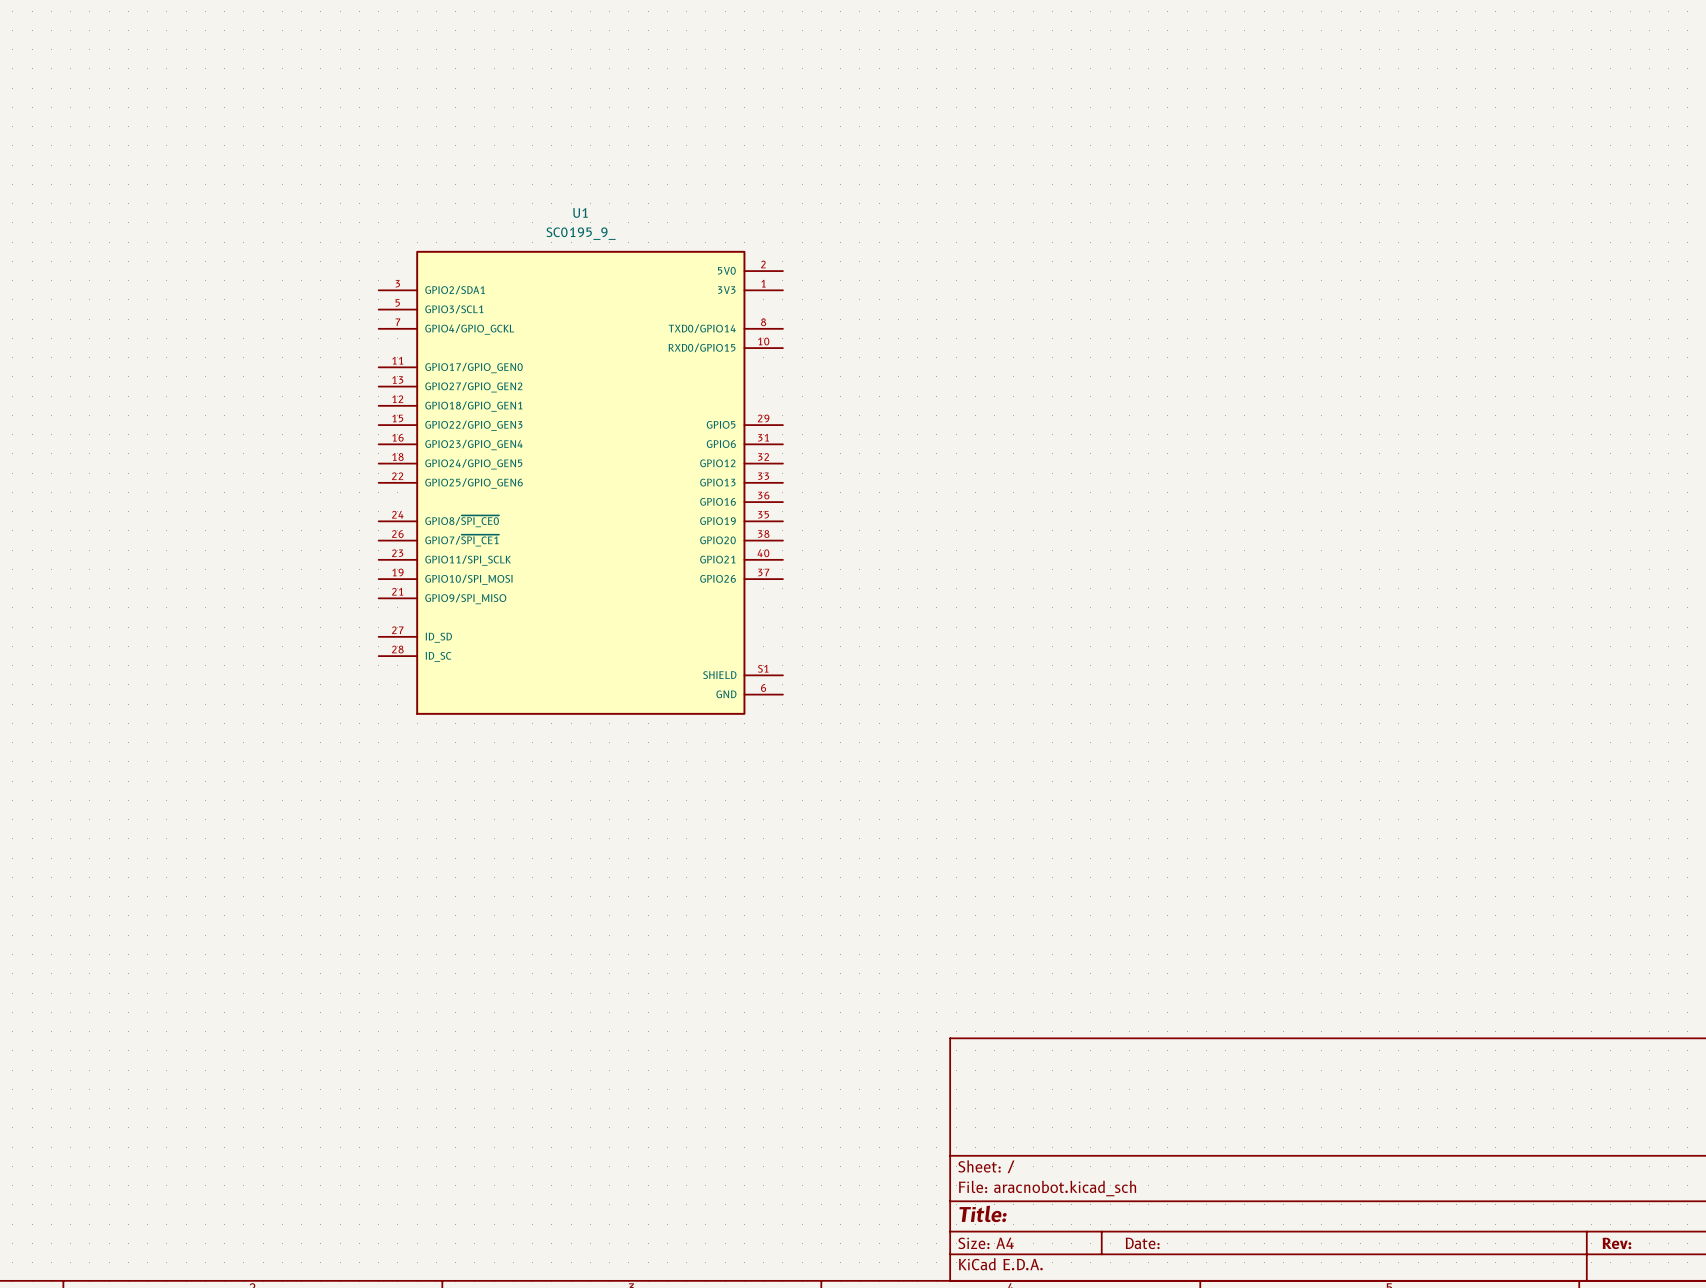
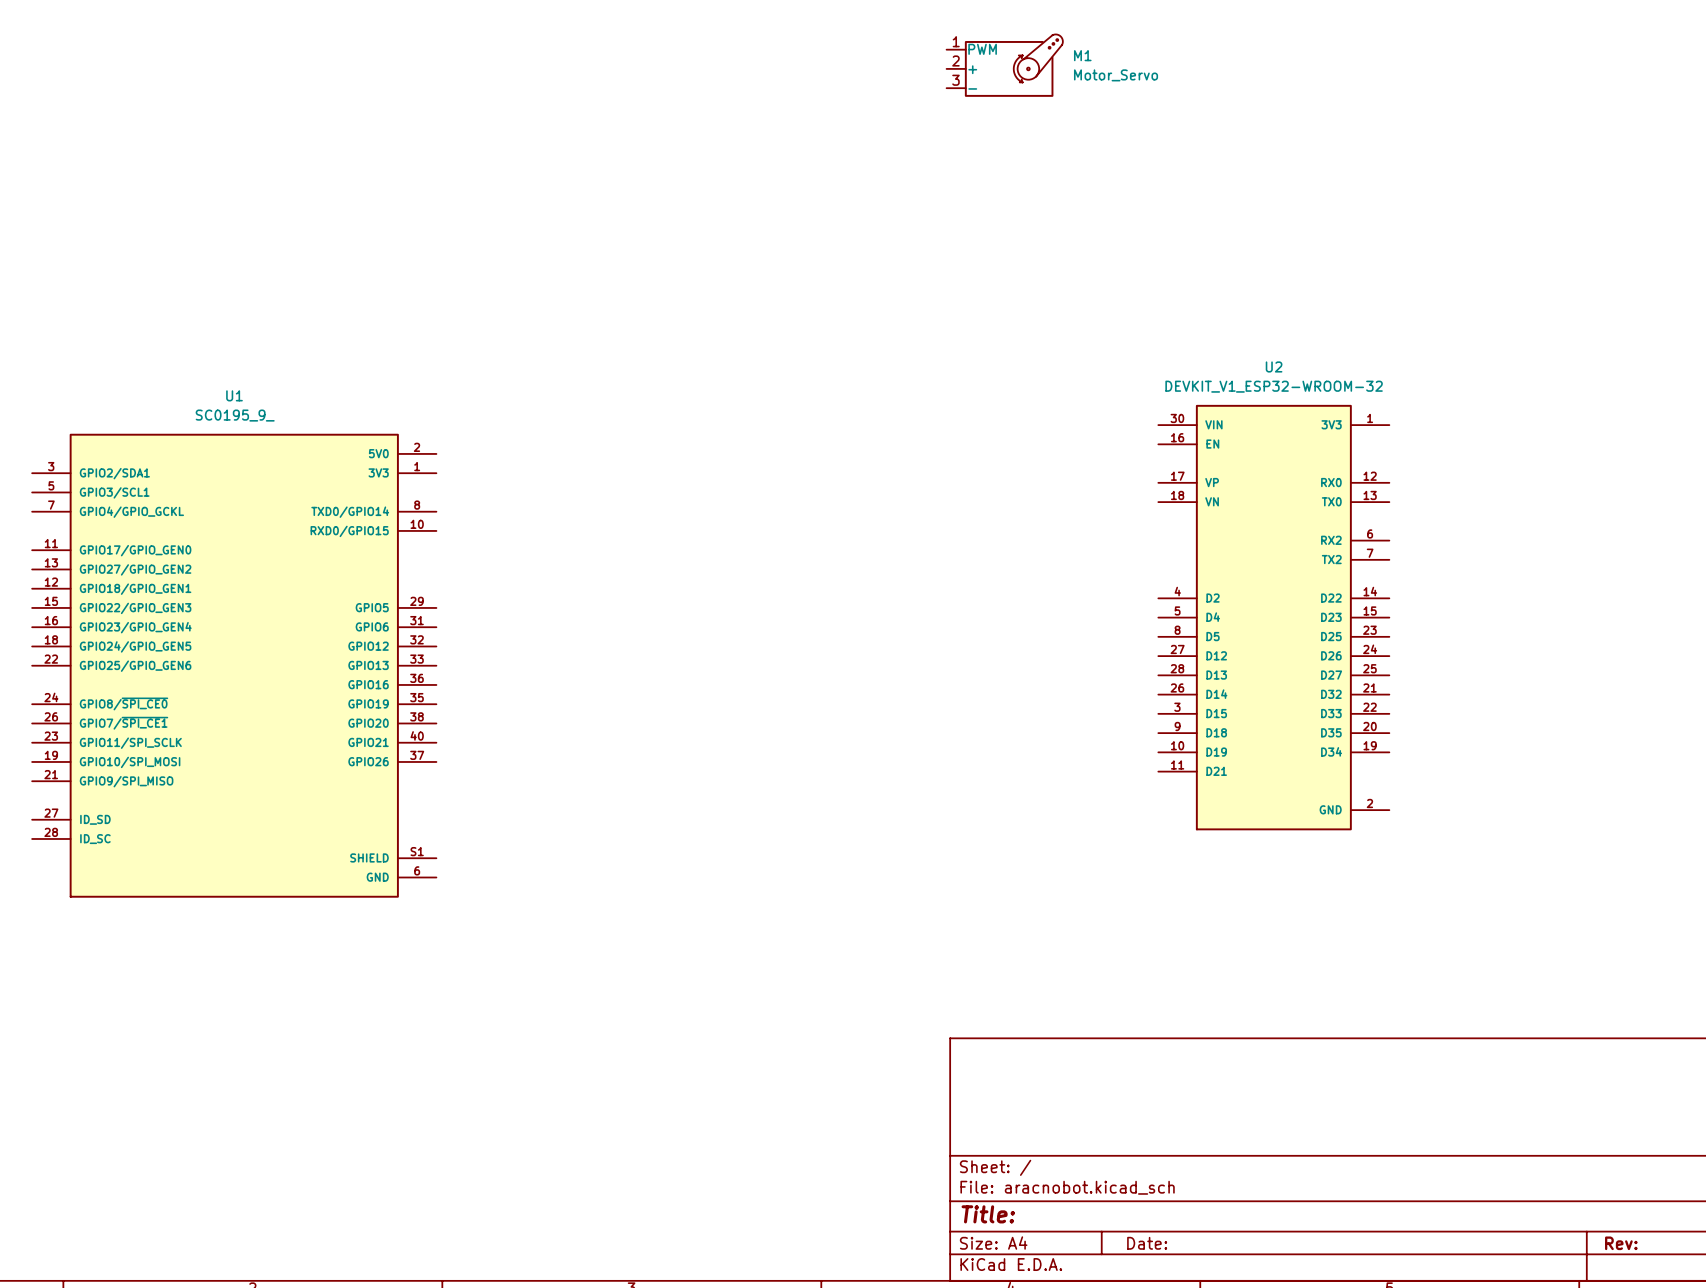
M1: none -> Motor_Servo (1004, 65)
U1 position: (580, 482) -> (234, 665)
U2: none -> DEVKIT_V1_ESP32-WROOM-32 (1273, 617)

